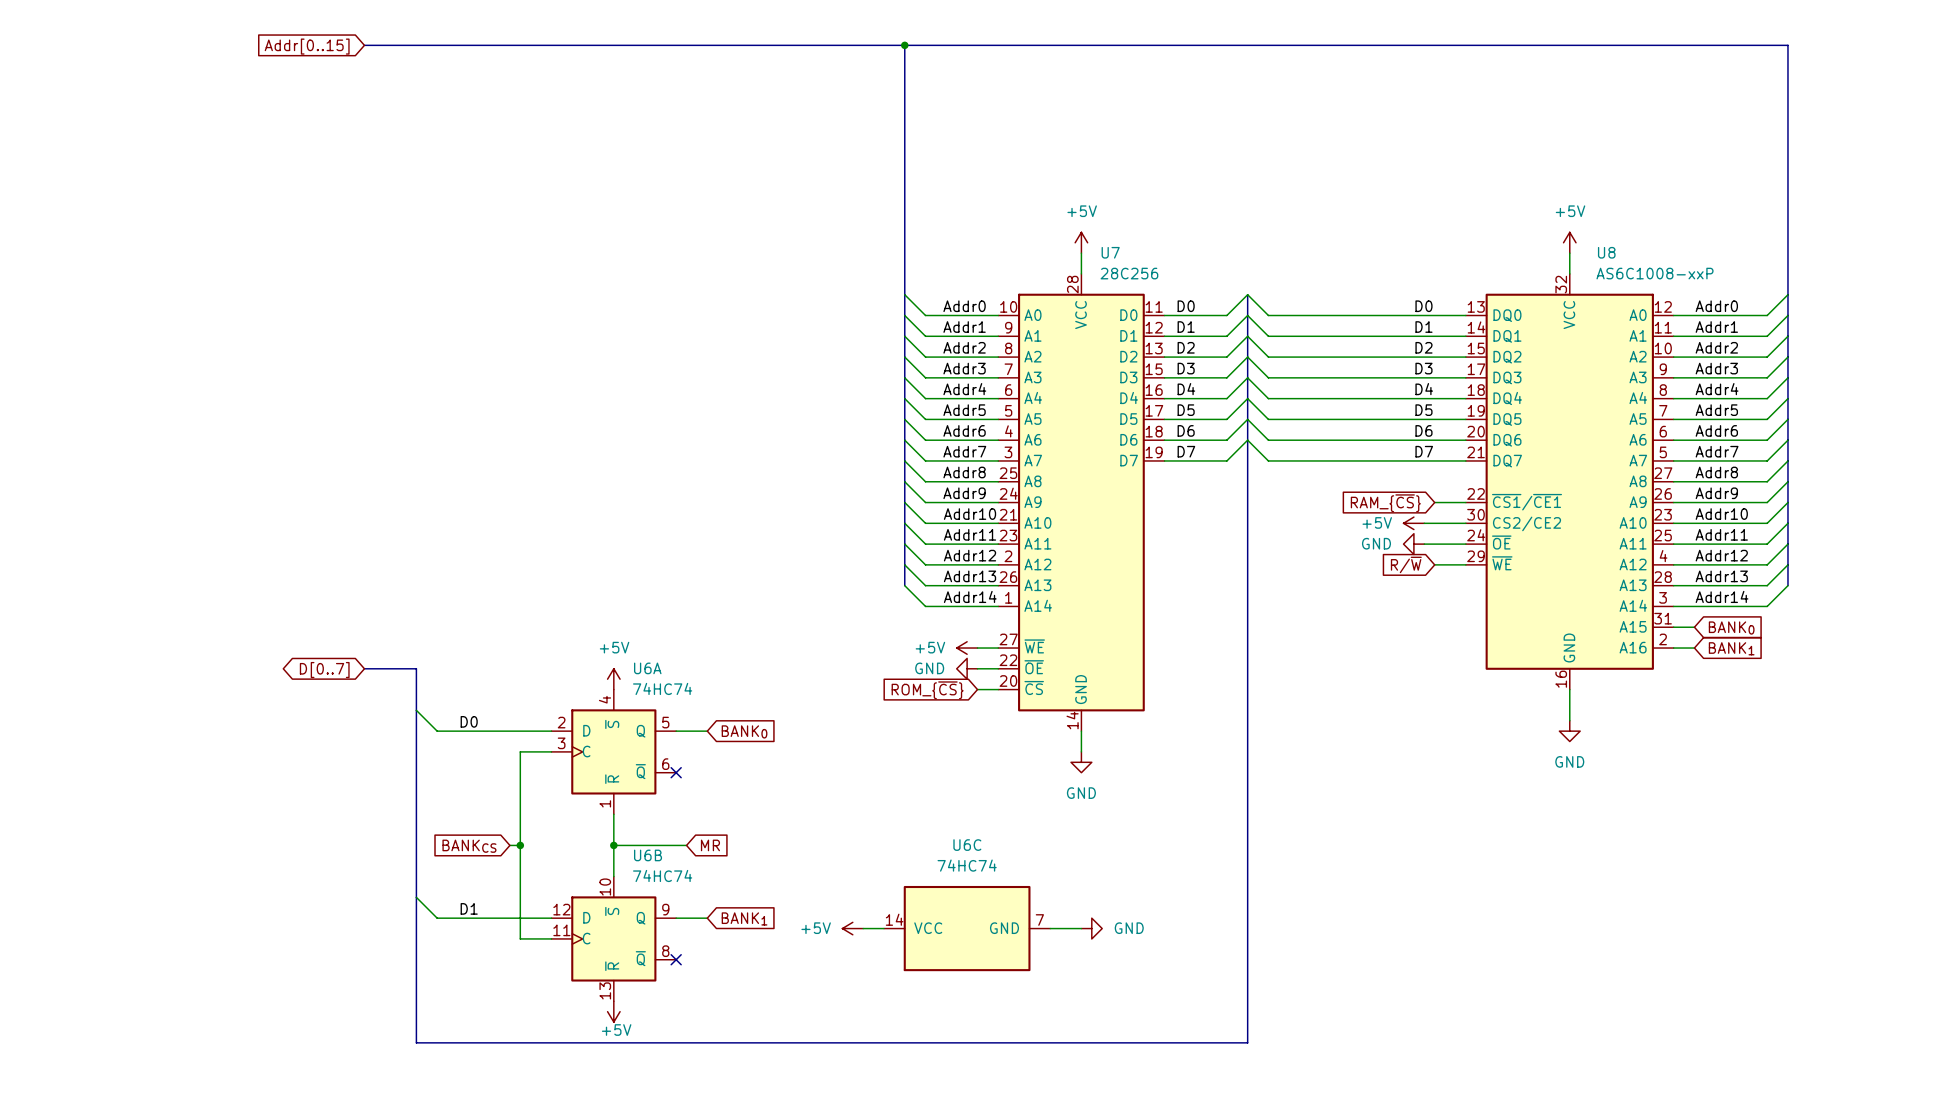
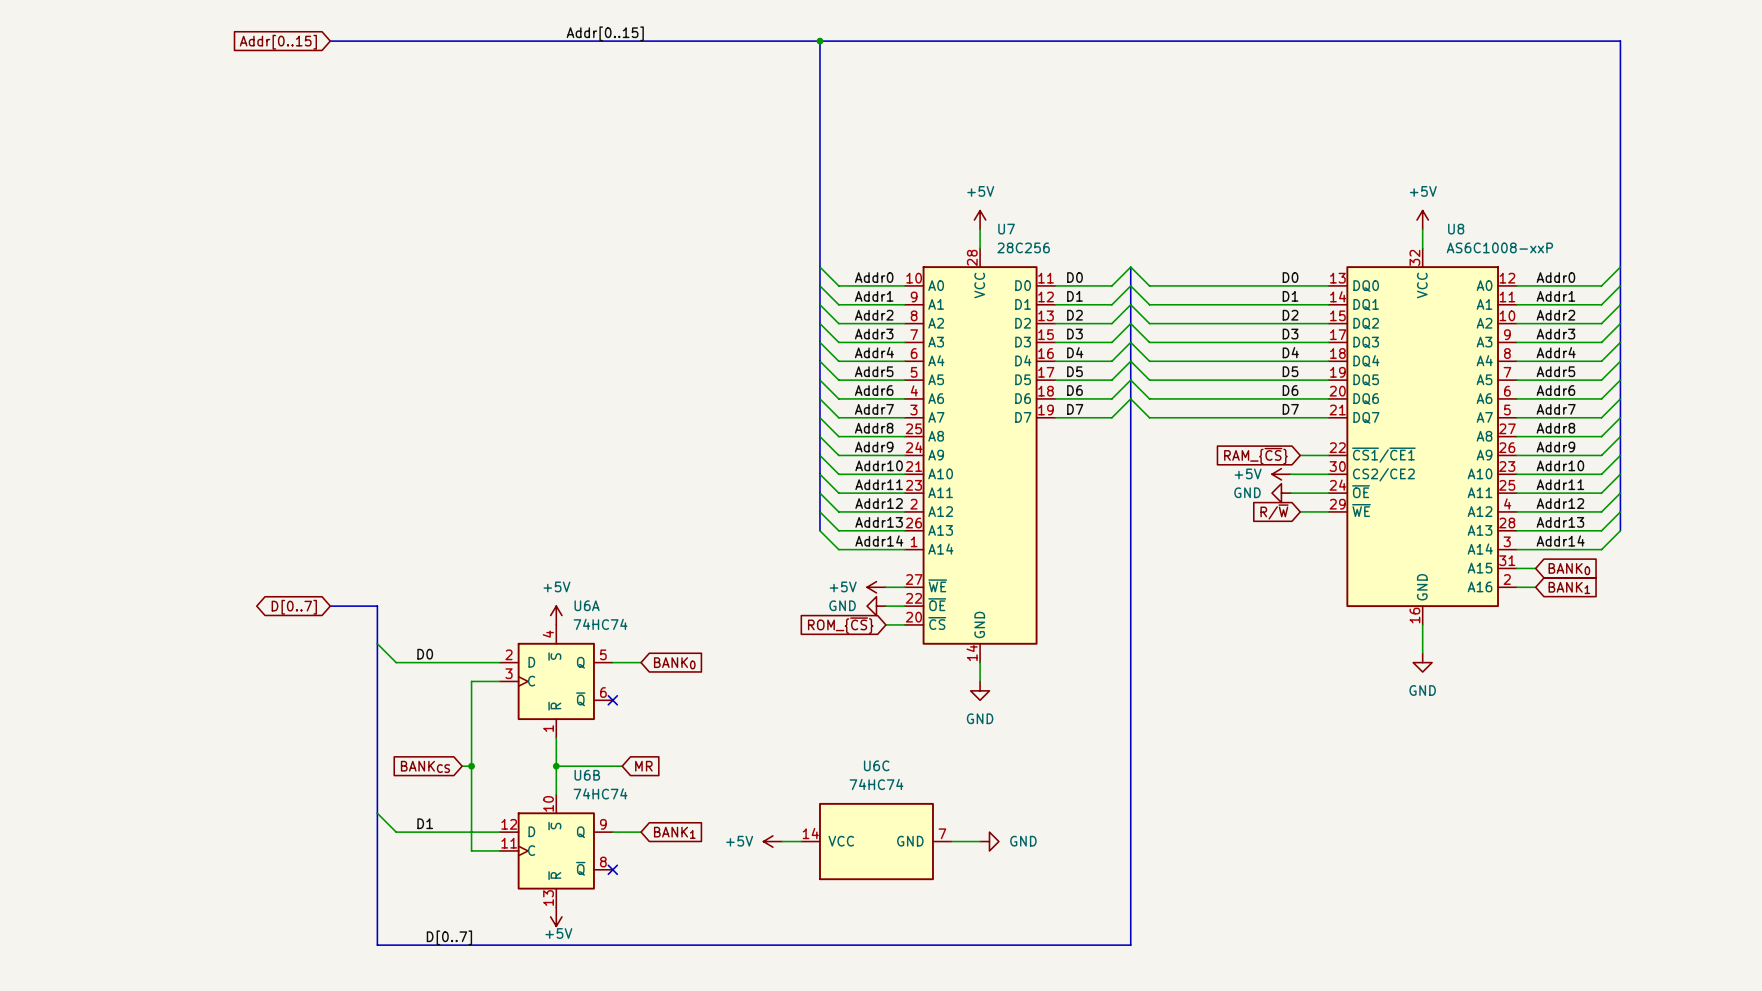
label: none -> Addr[0..15] (605, 33)
label: none -> D[0..7] (449, 937)

